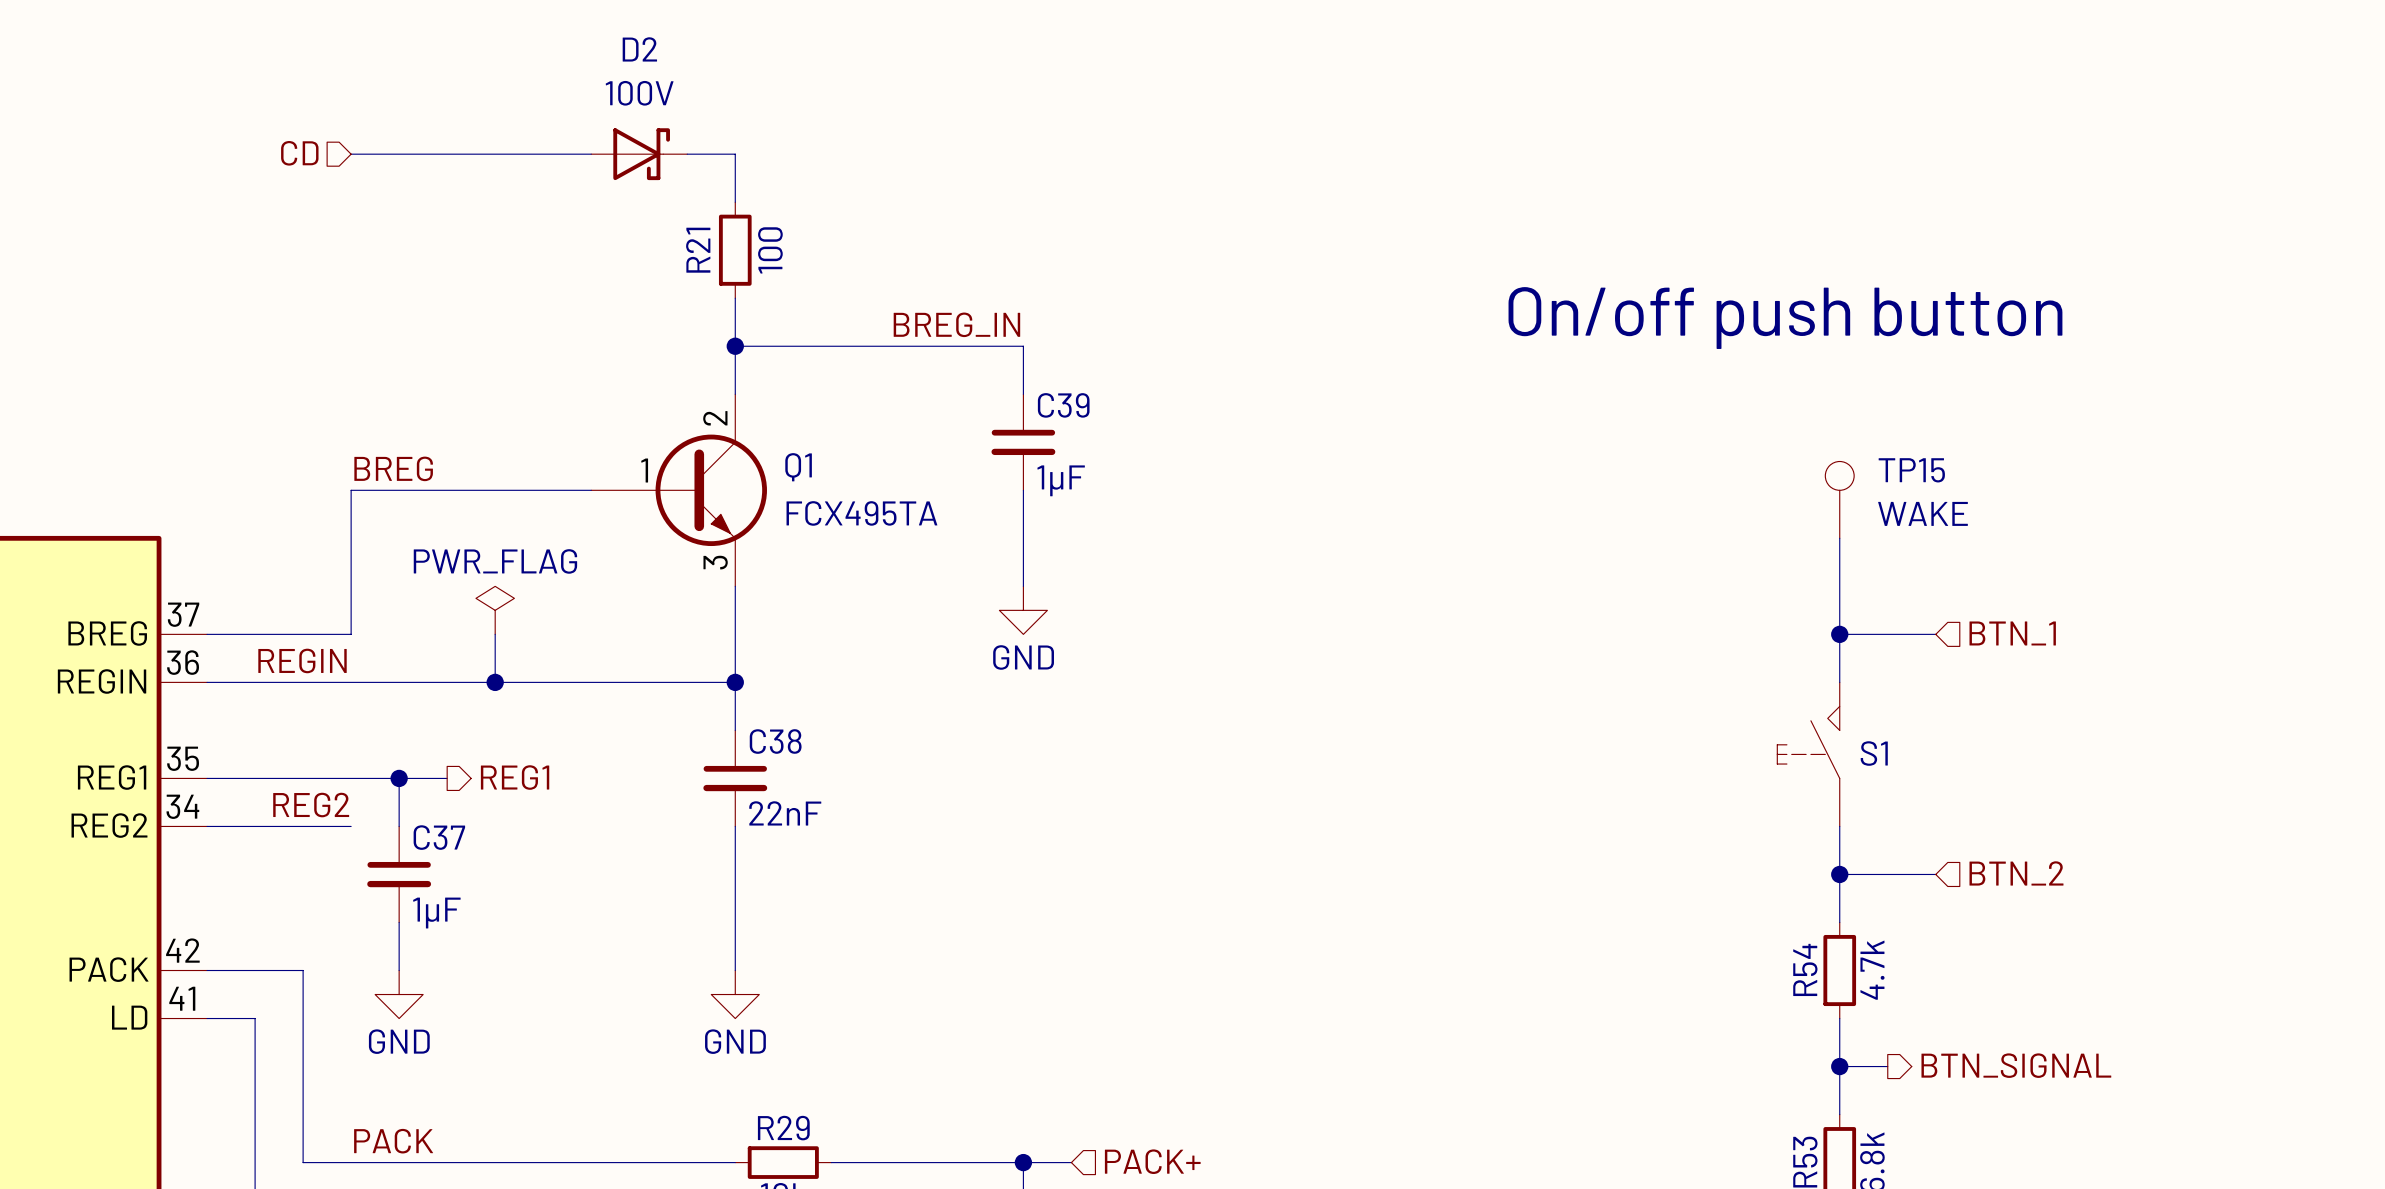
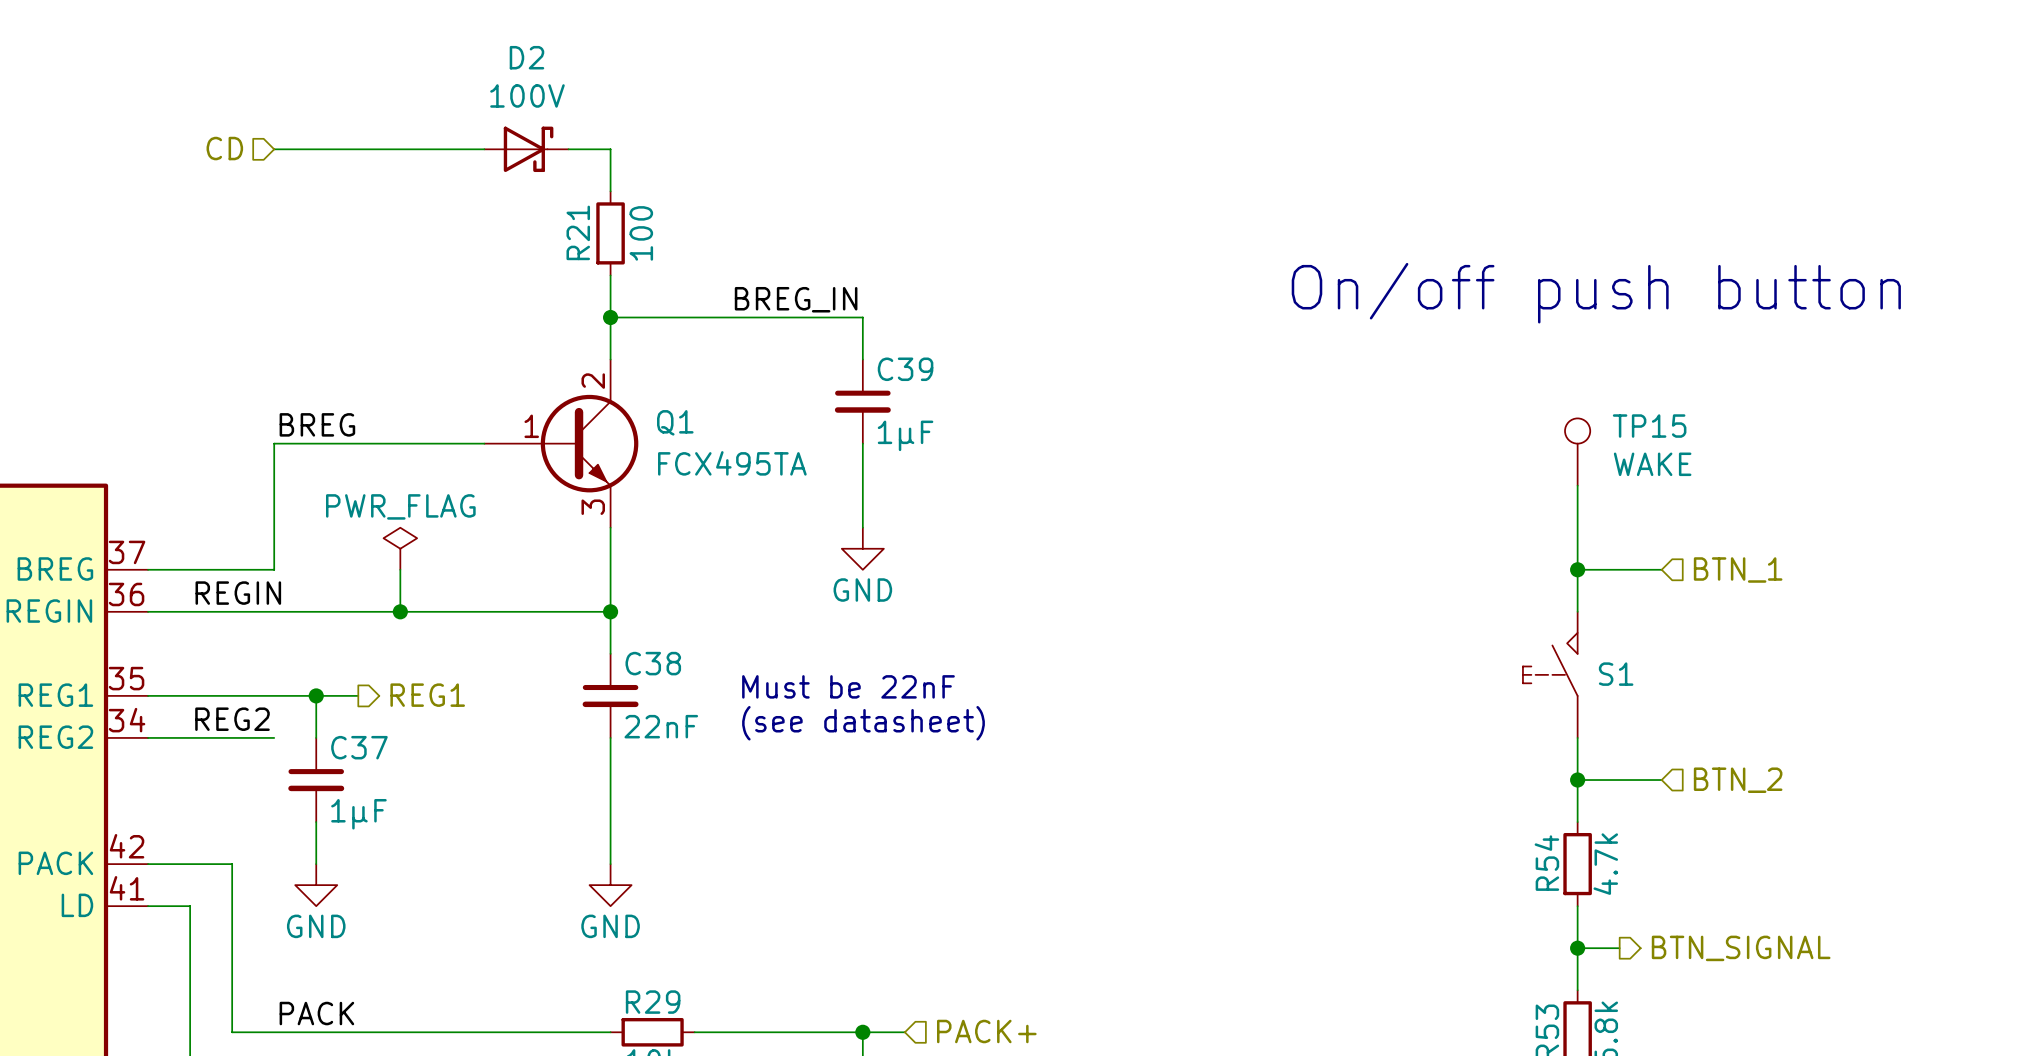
text: none -> Must be 22nF (848, 686)
text: none -> (see datasheet) (863, 723)

